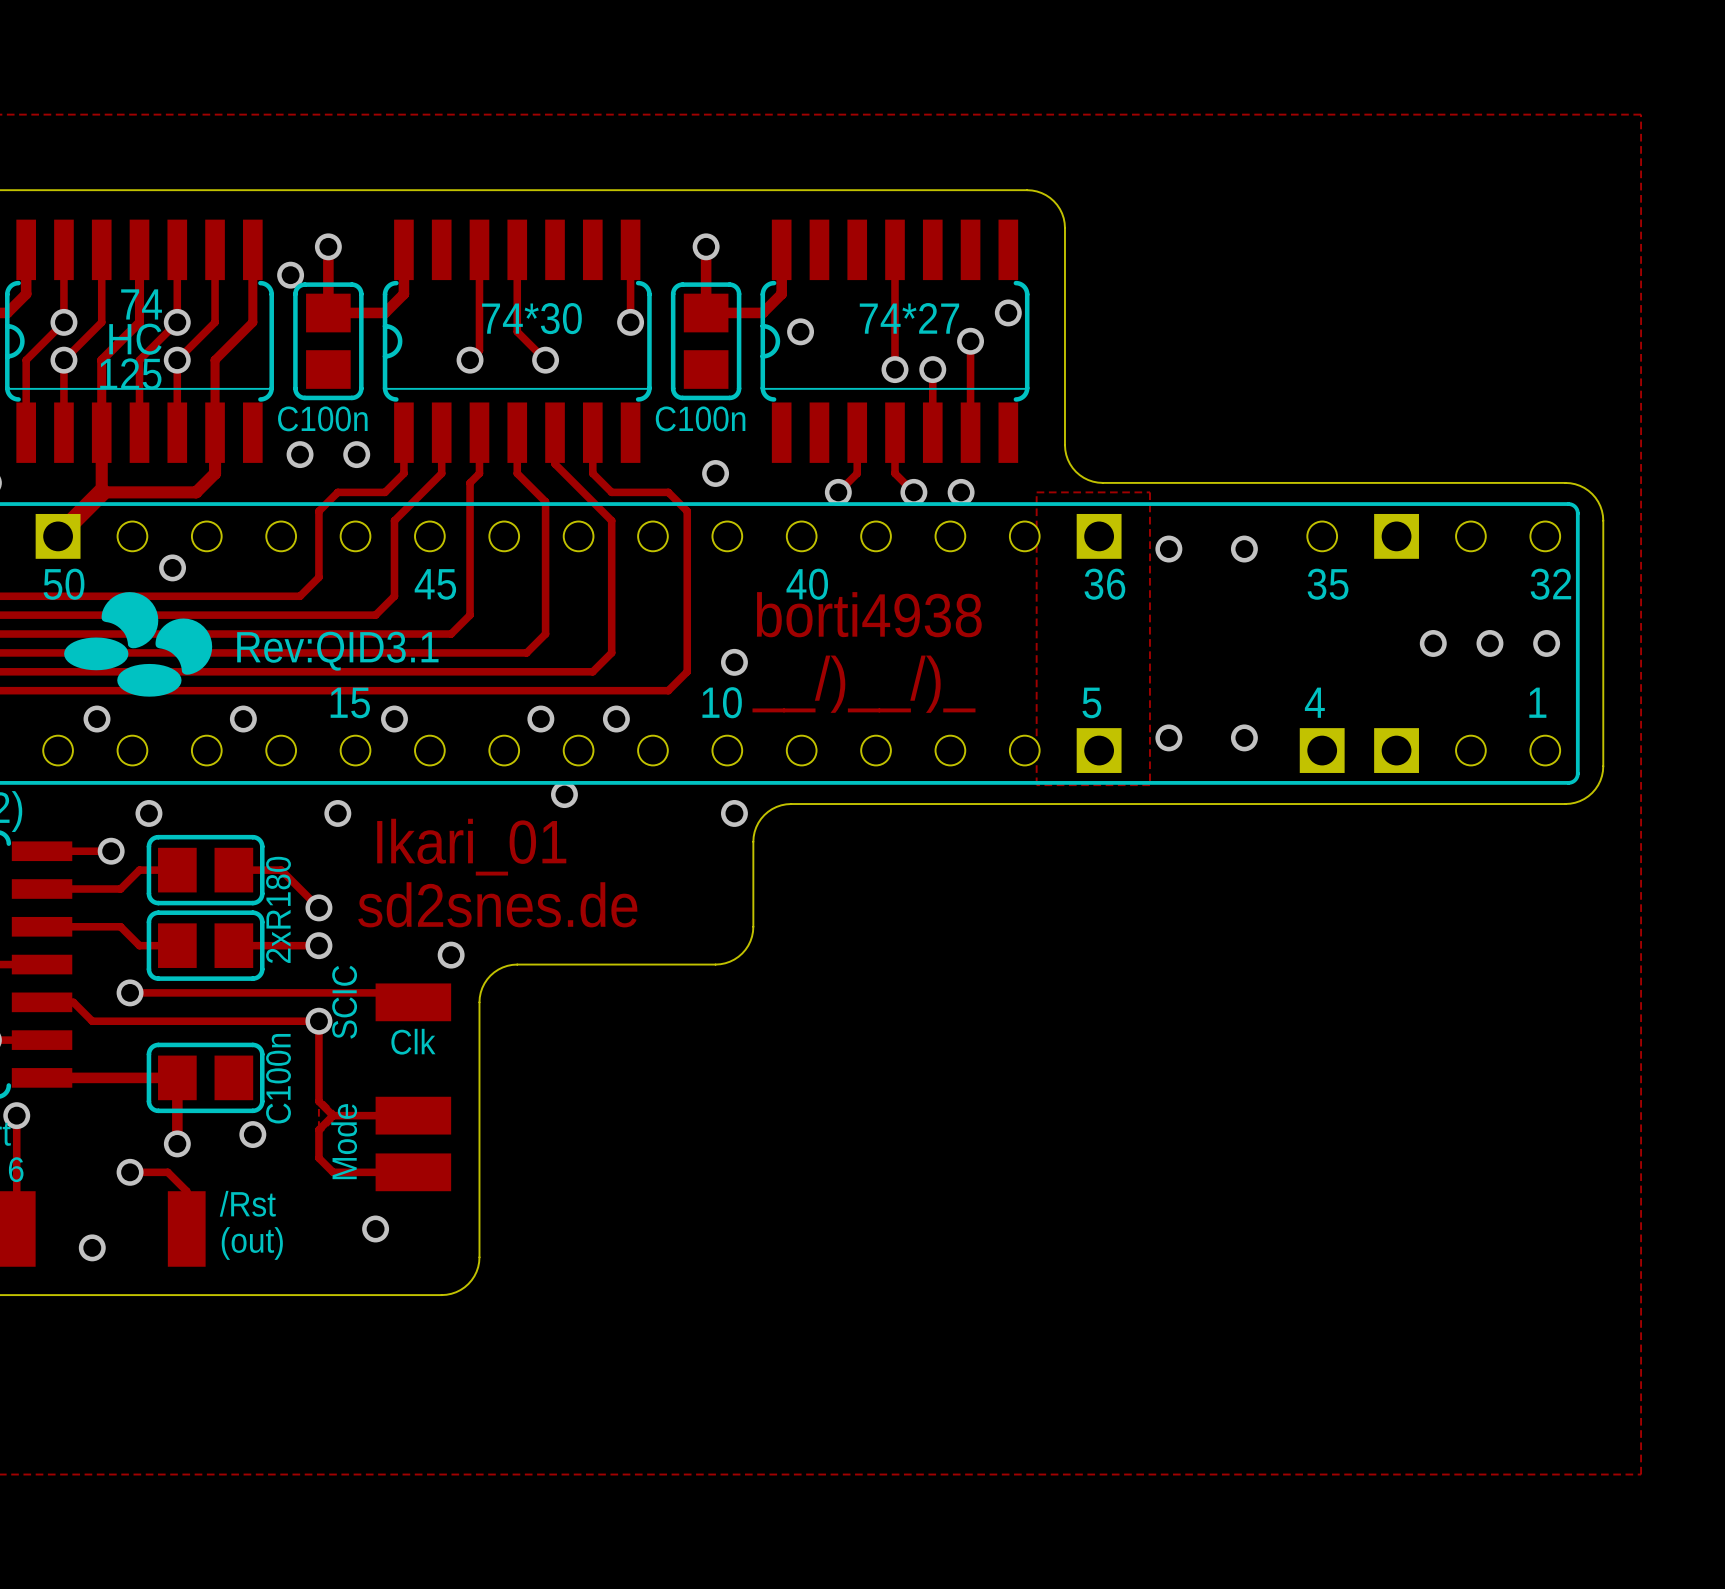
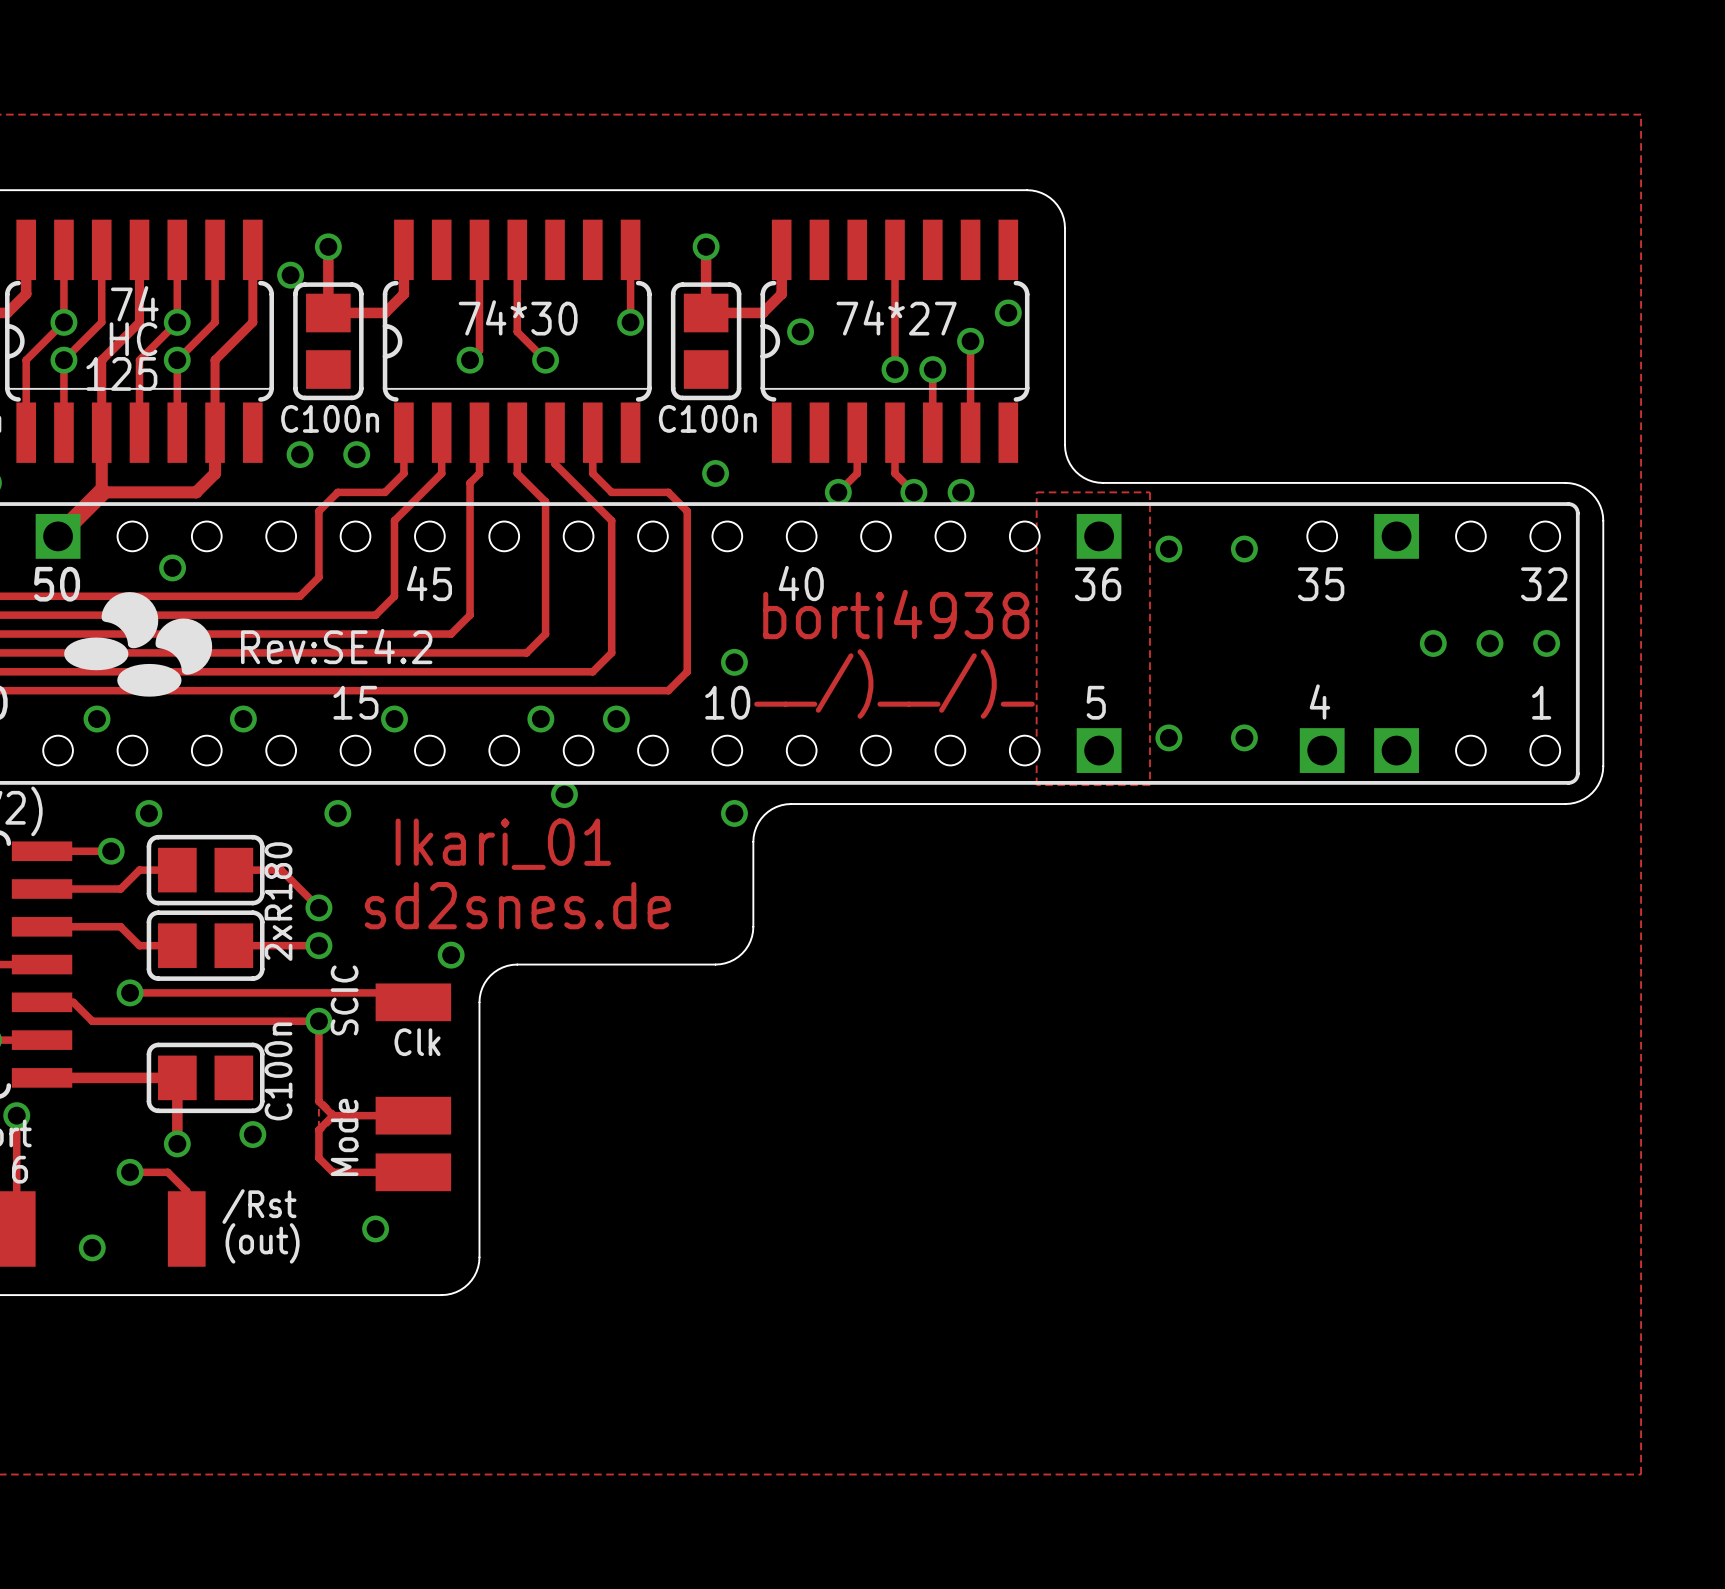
text: Rev:QID3.1 (337, 651) -> Rev:SE4.2 (336, 646)

